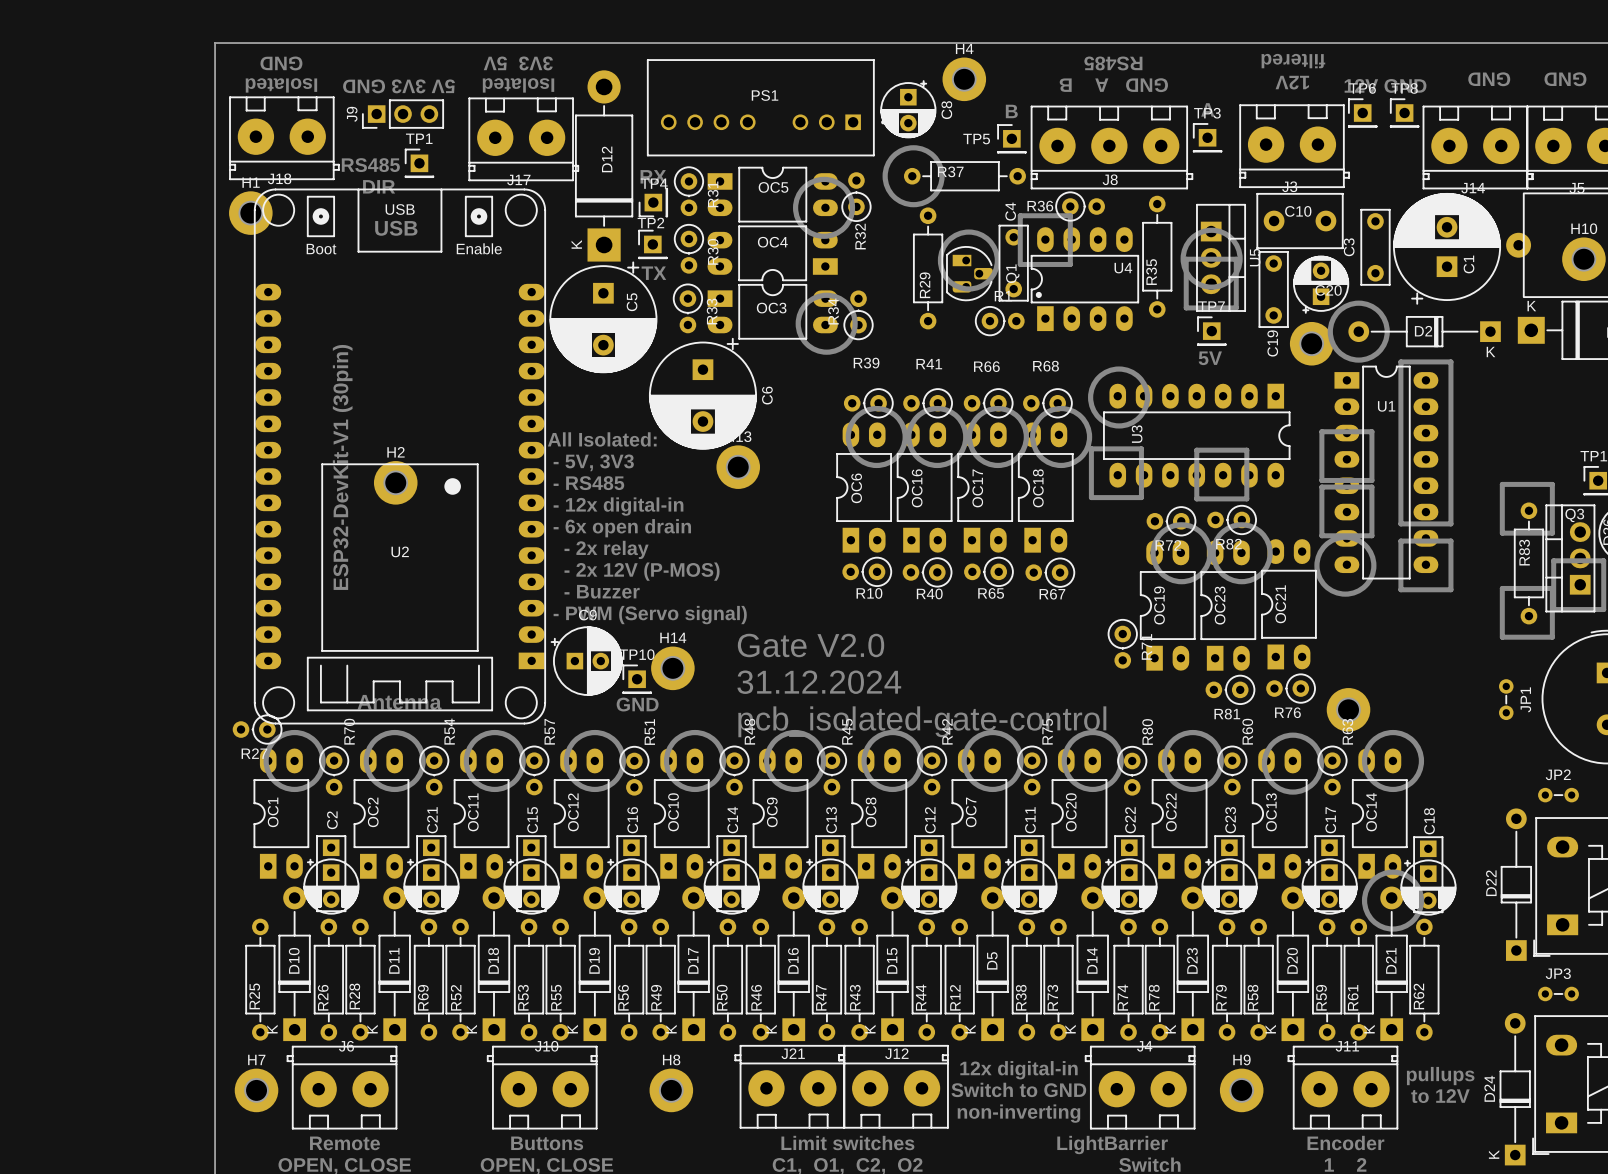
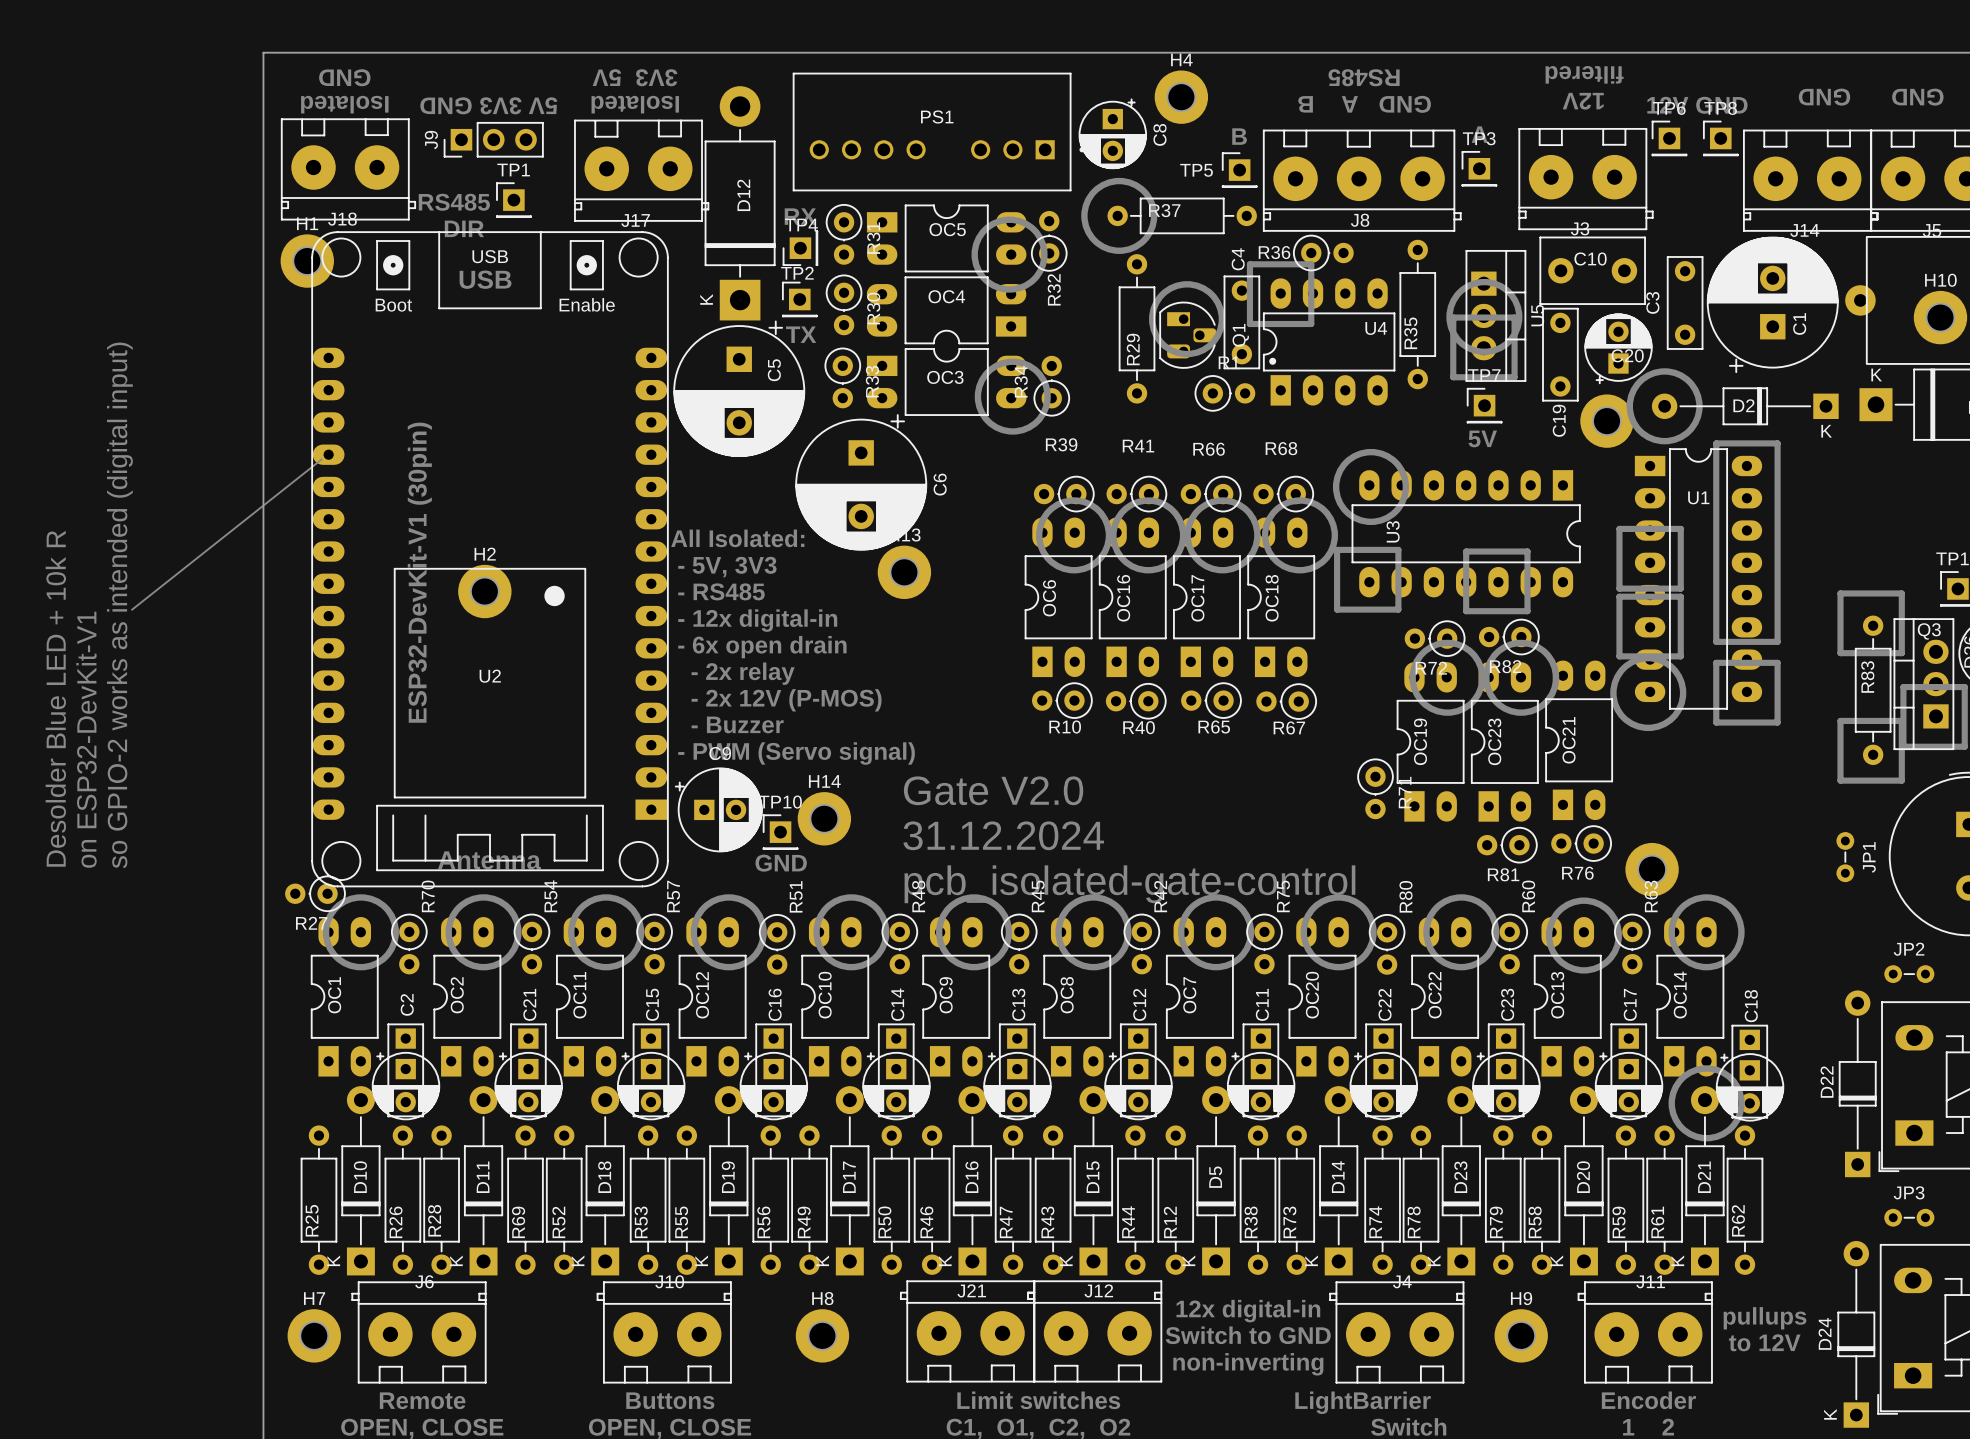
line: none -> (321, 459) (131, 609)
text: none -> so GPIO-2 works as intended (digital input) (119, 605)
text: none -> Desolder Blue LED + 10k R (55, 698)
text: none -> on ESP32-DevKit-V1 (86, 739)

